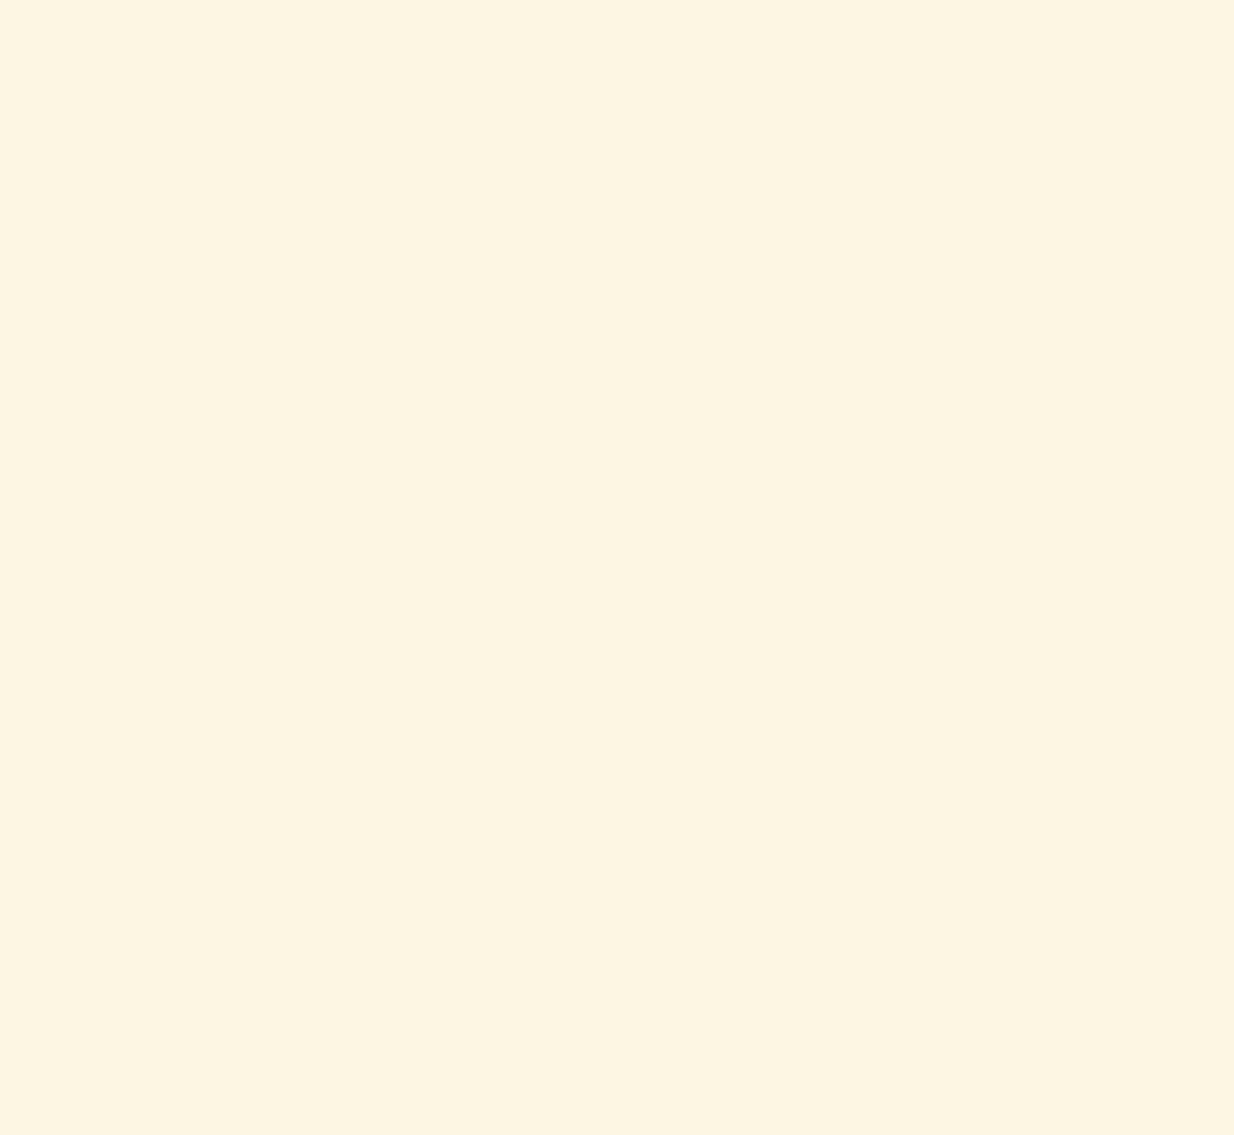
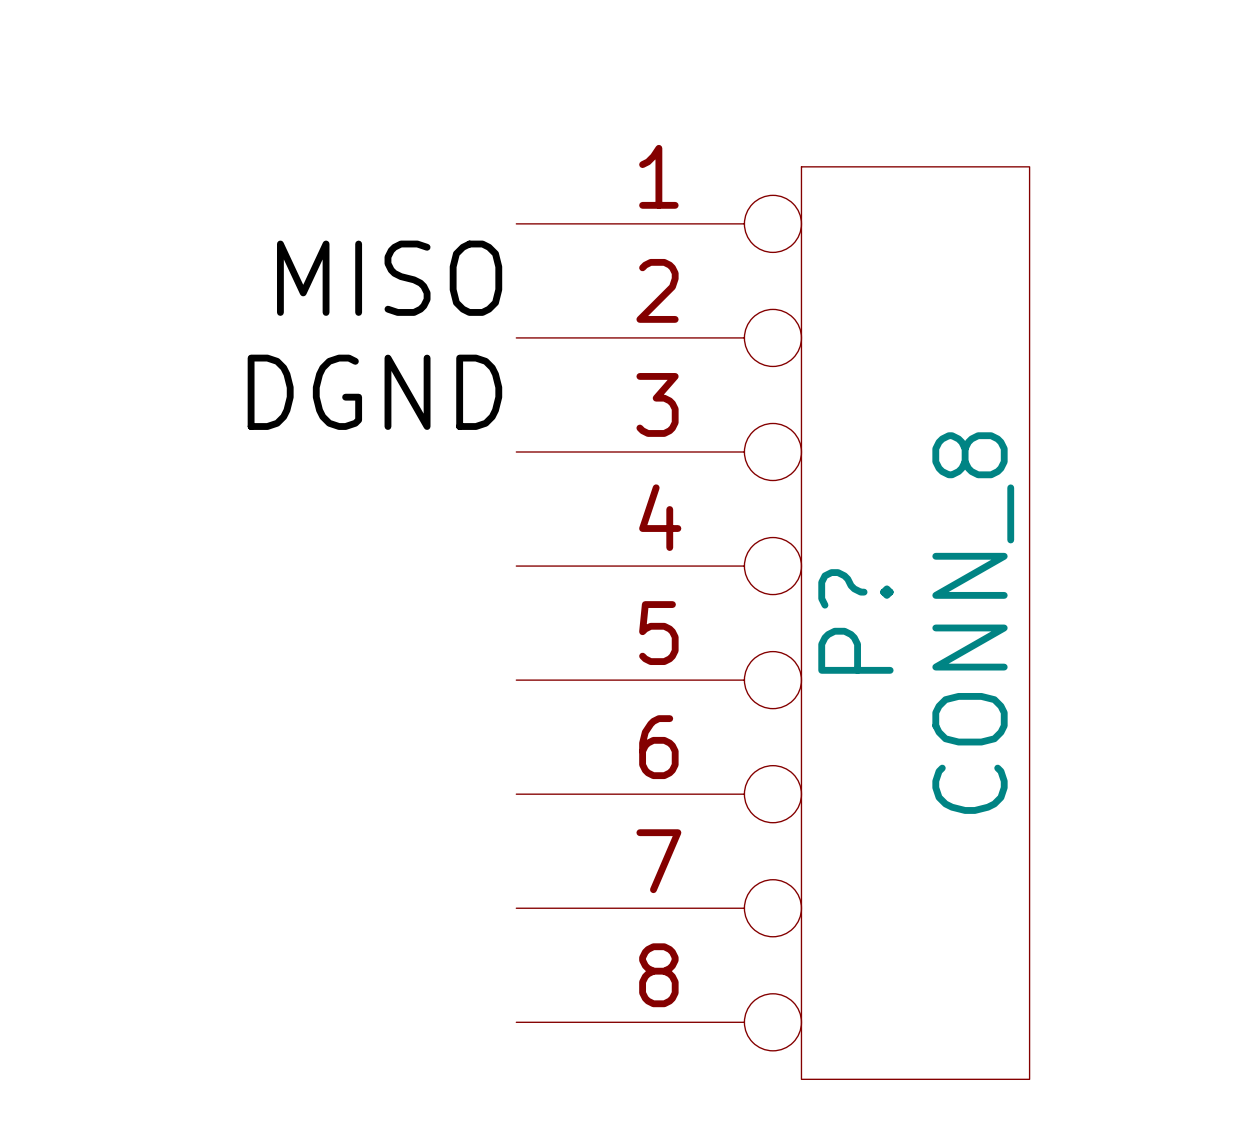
label: none -> MISO (389, 278)
label: none -> DGND (374, 392)
P?: none -> CONN_8 (772, 623)

